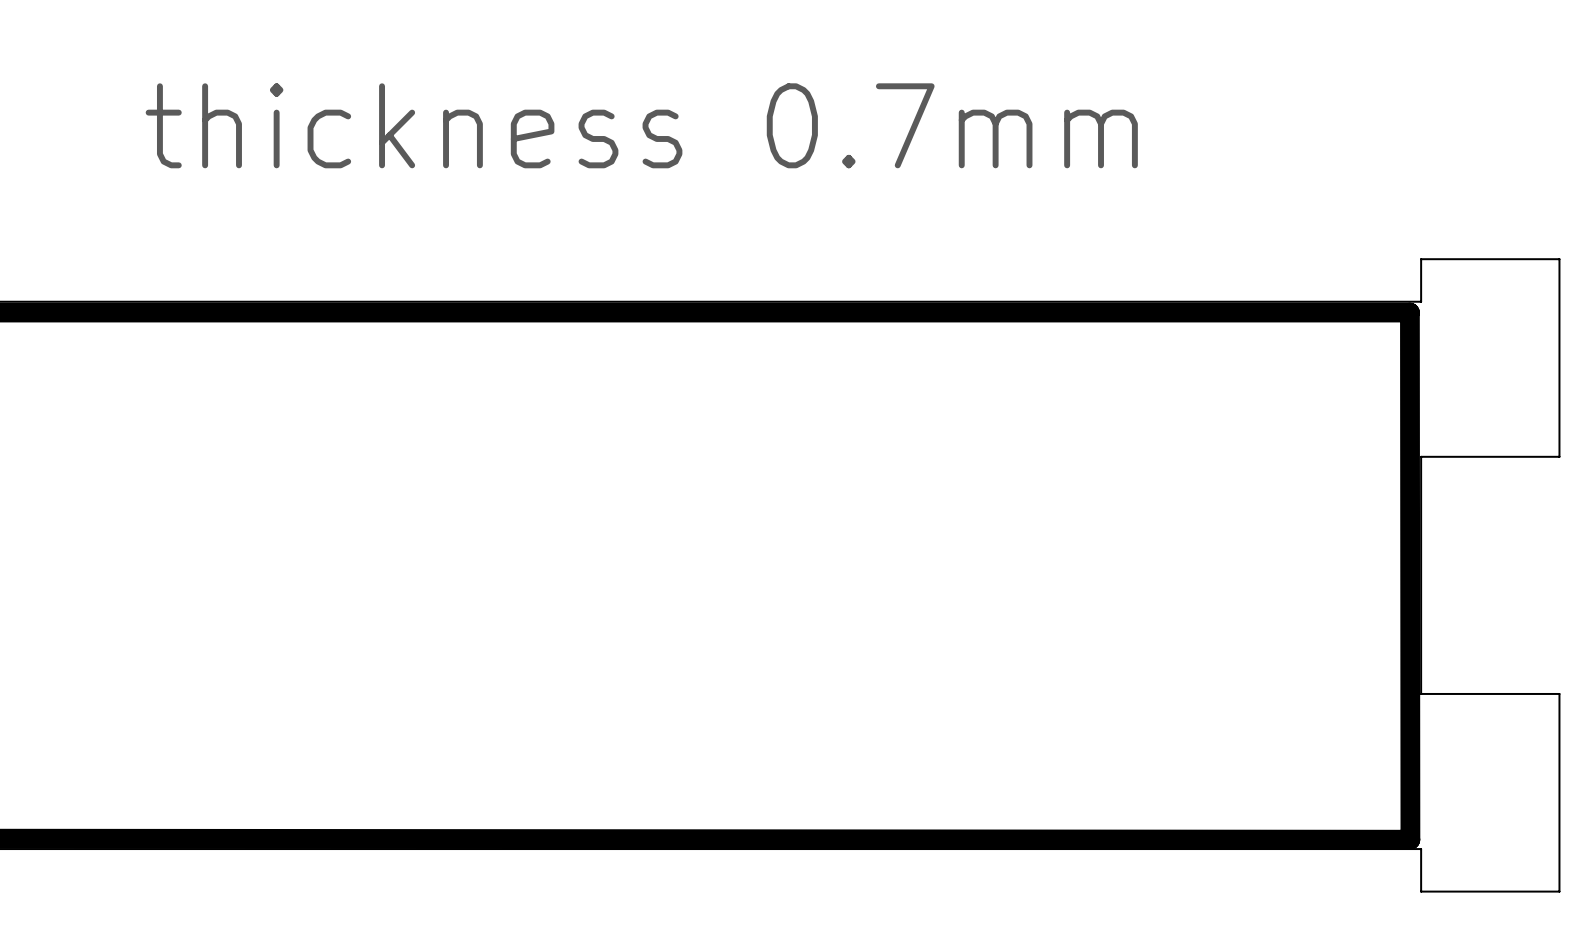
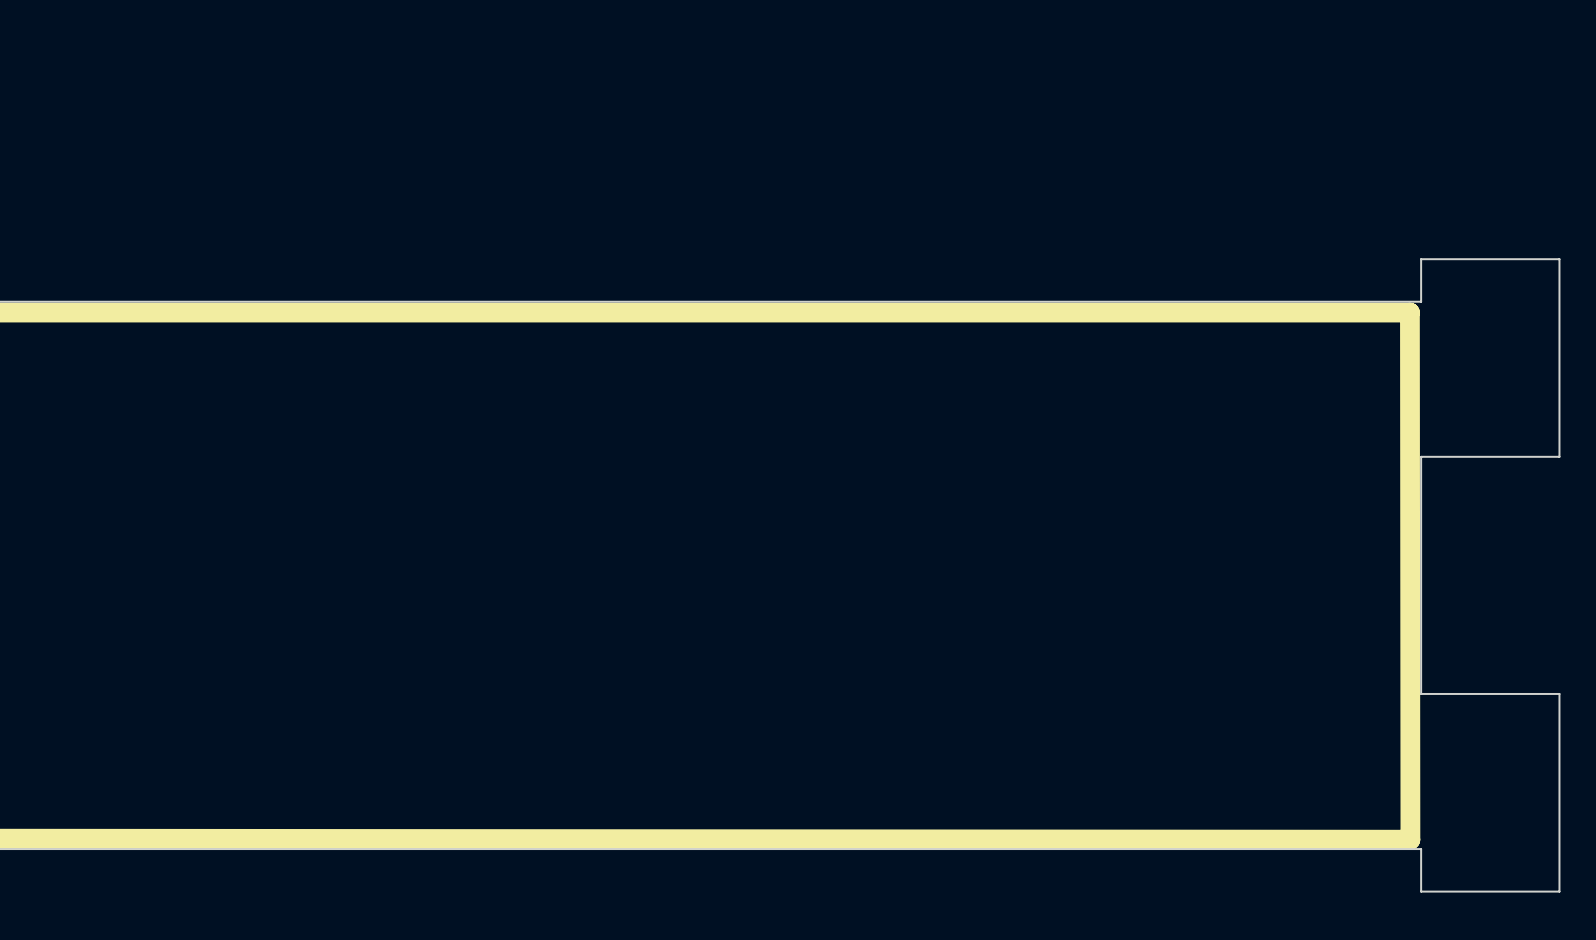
text: thickness 0.7mm (641, 125) -> none

